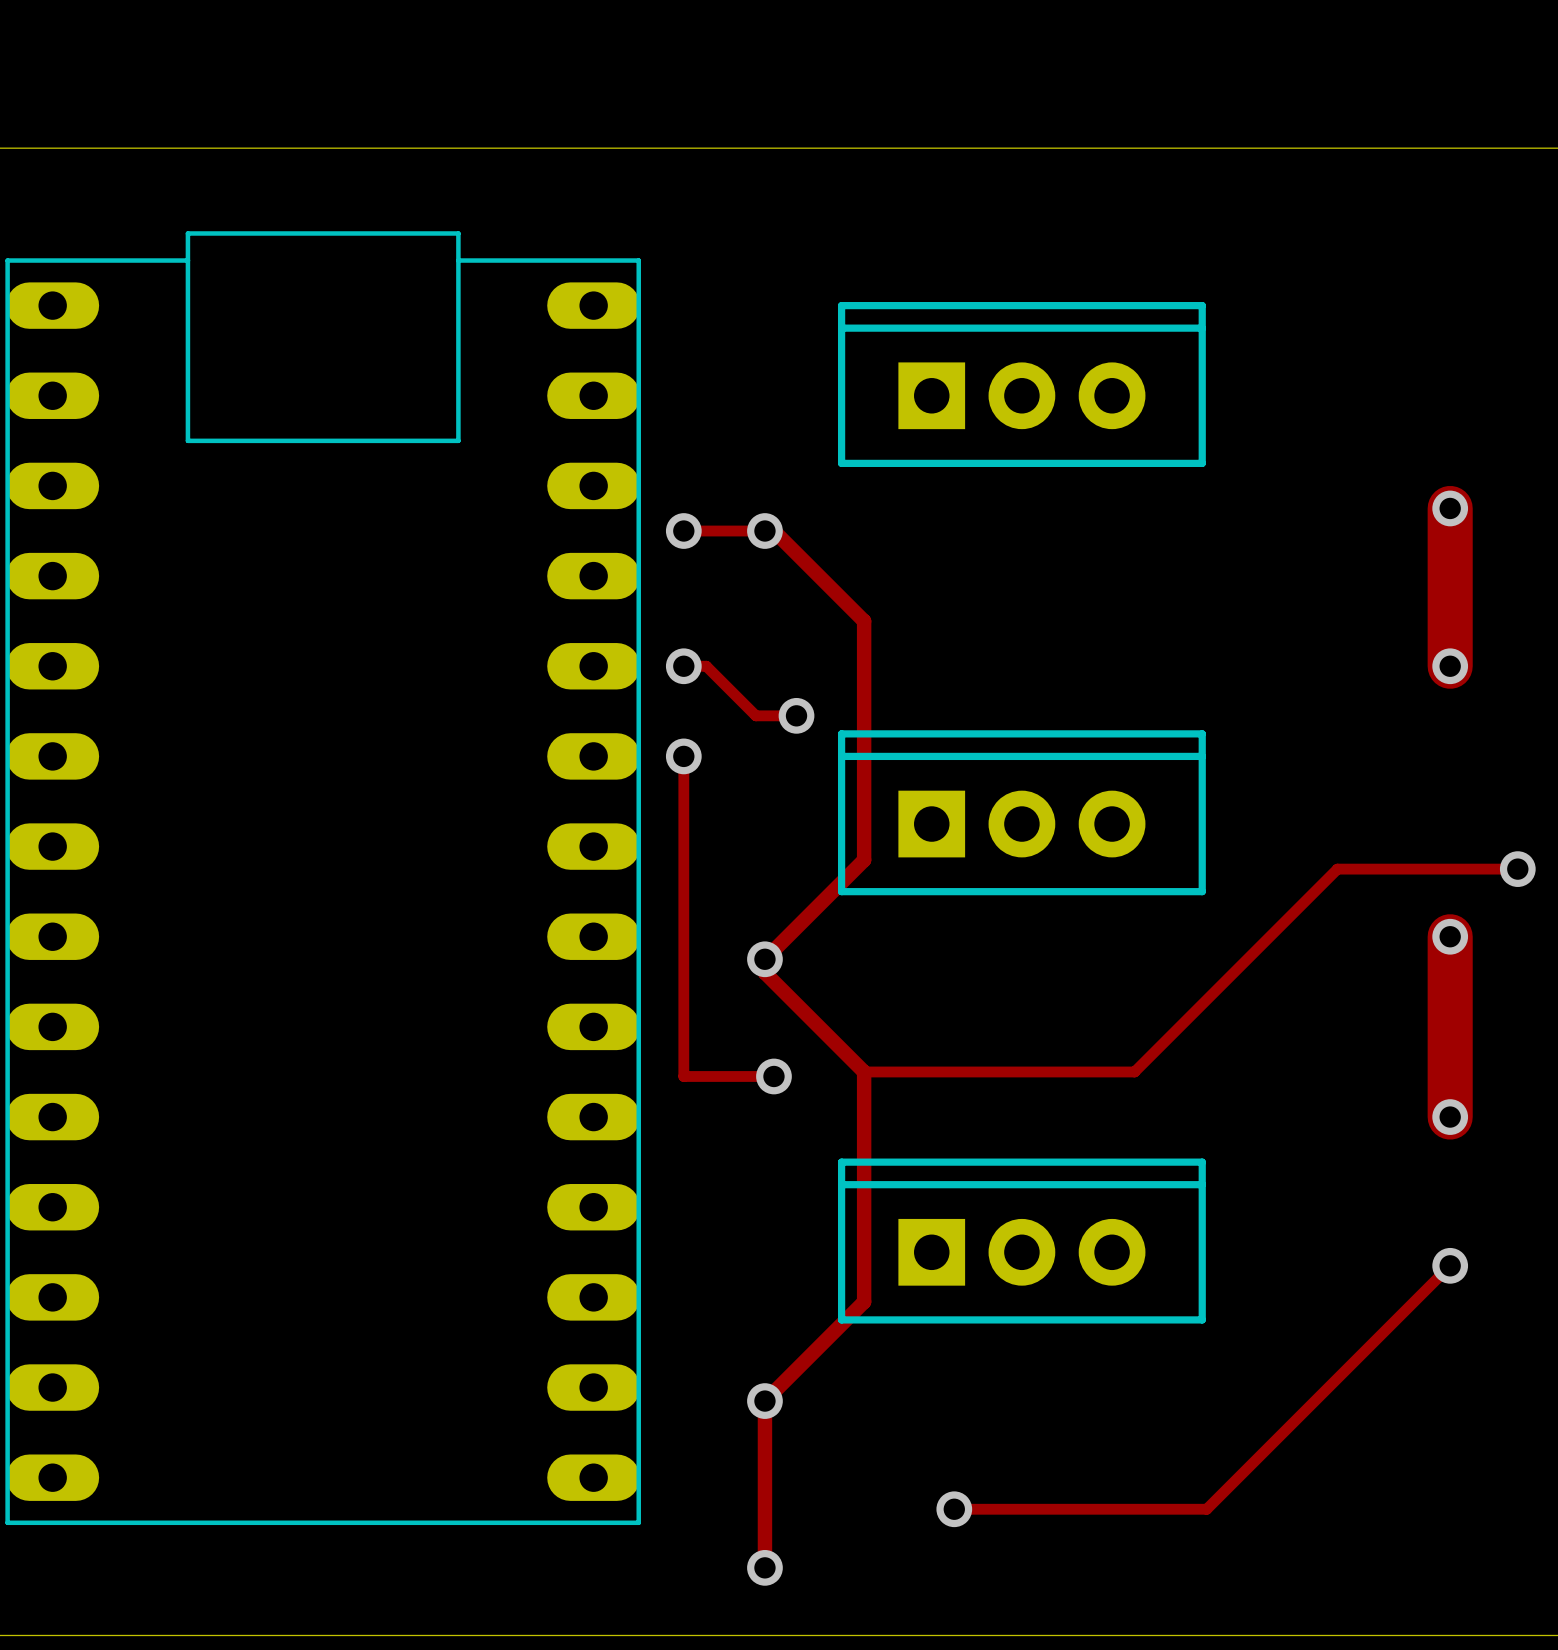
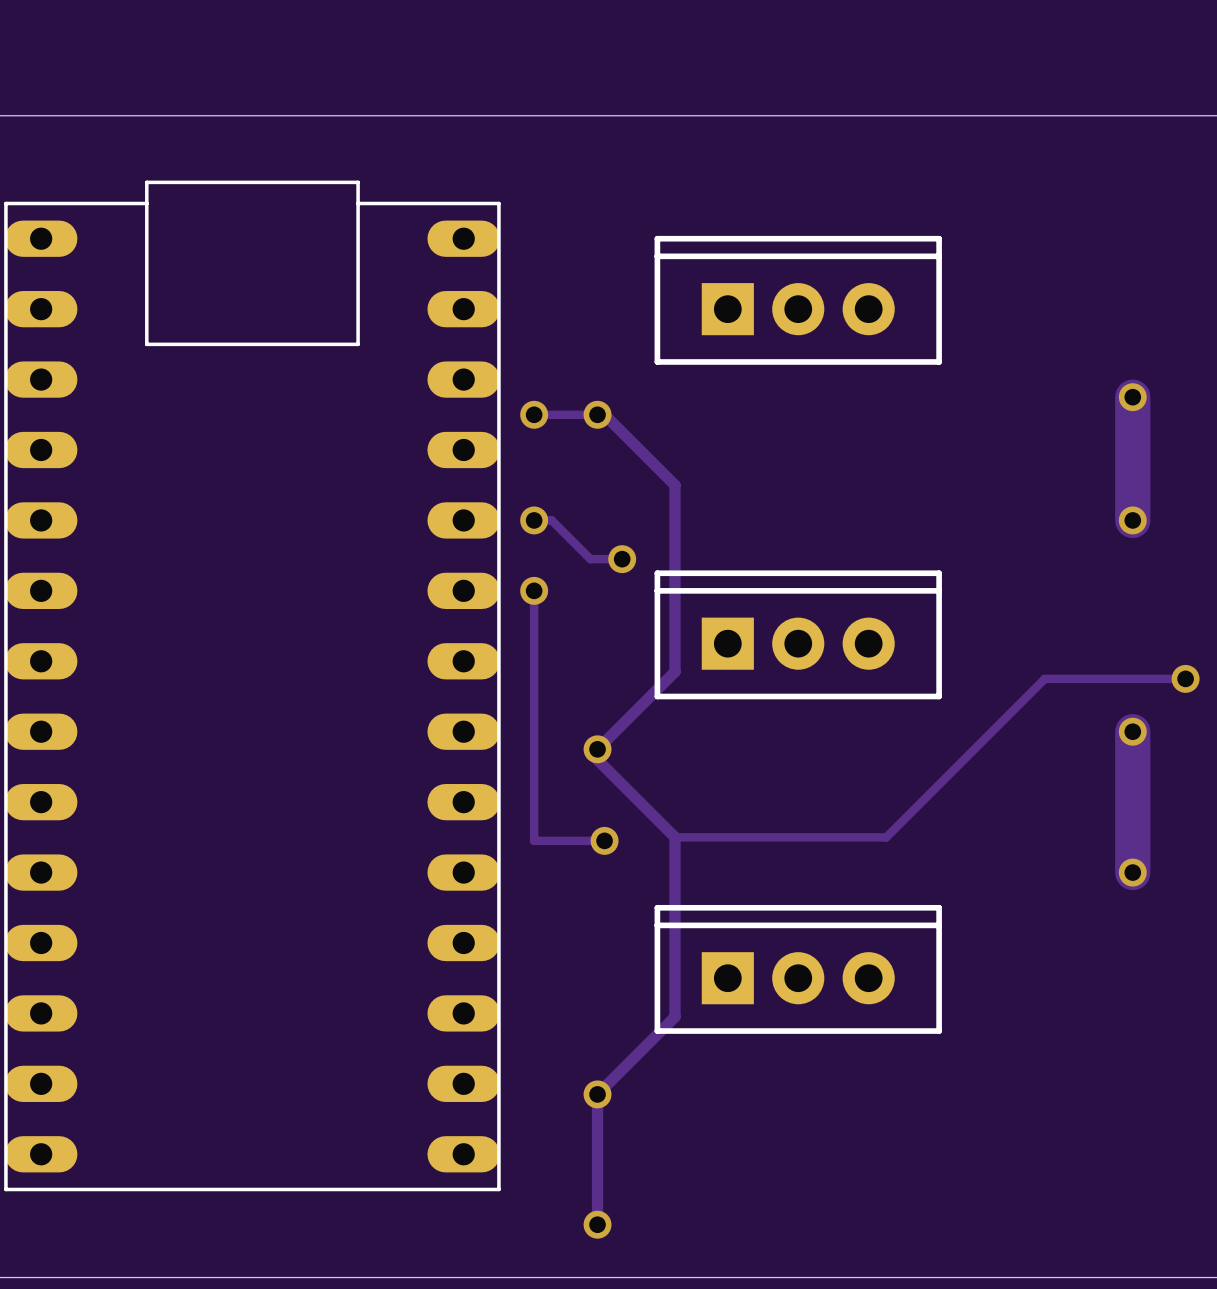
track: (1450, 1265) (1206, 1509) (954, 1509) -> none
via: (1450, 1265) -> none
via: (954, 1509) -> none

